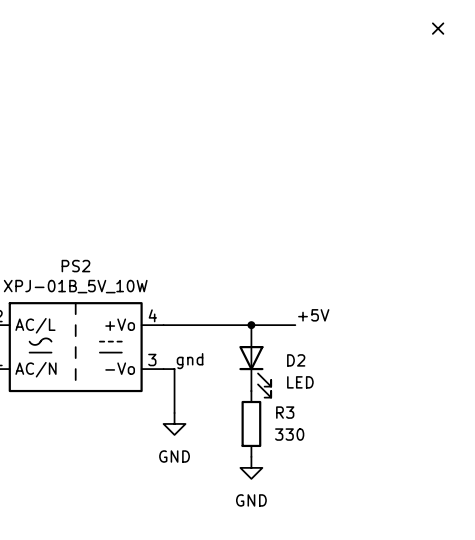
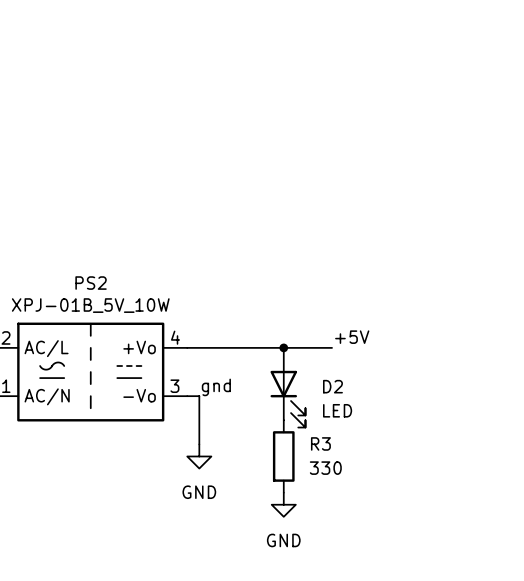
no-connect mark: (438, 28) -> none

